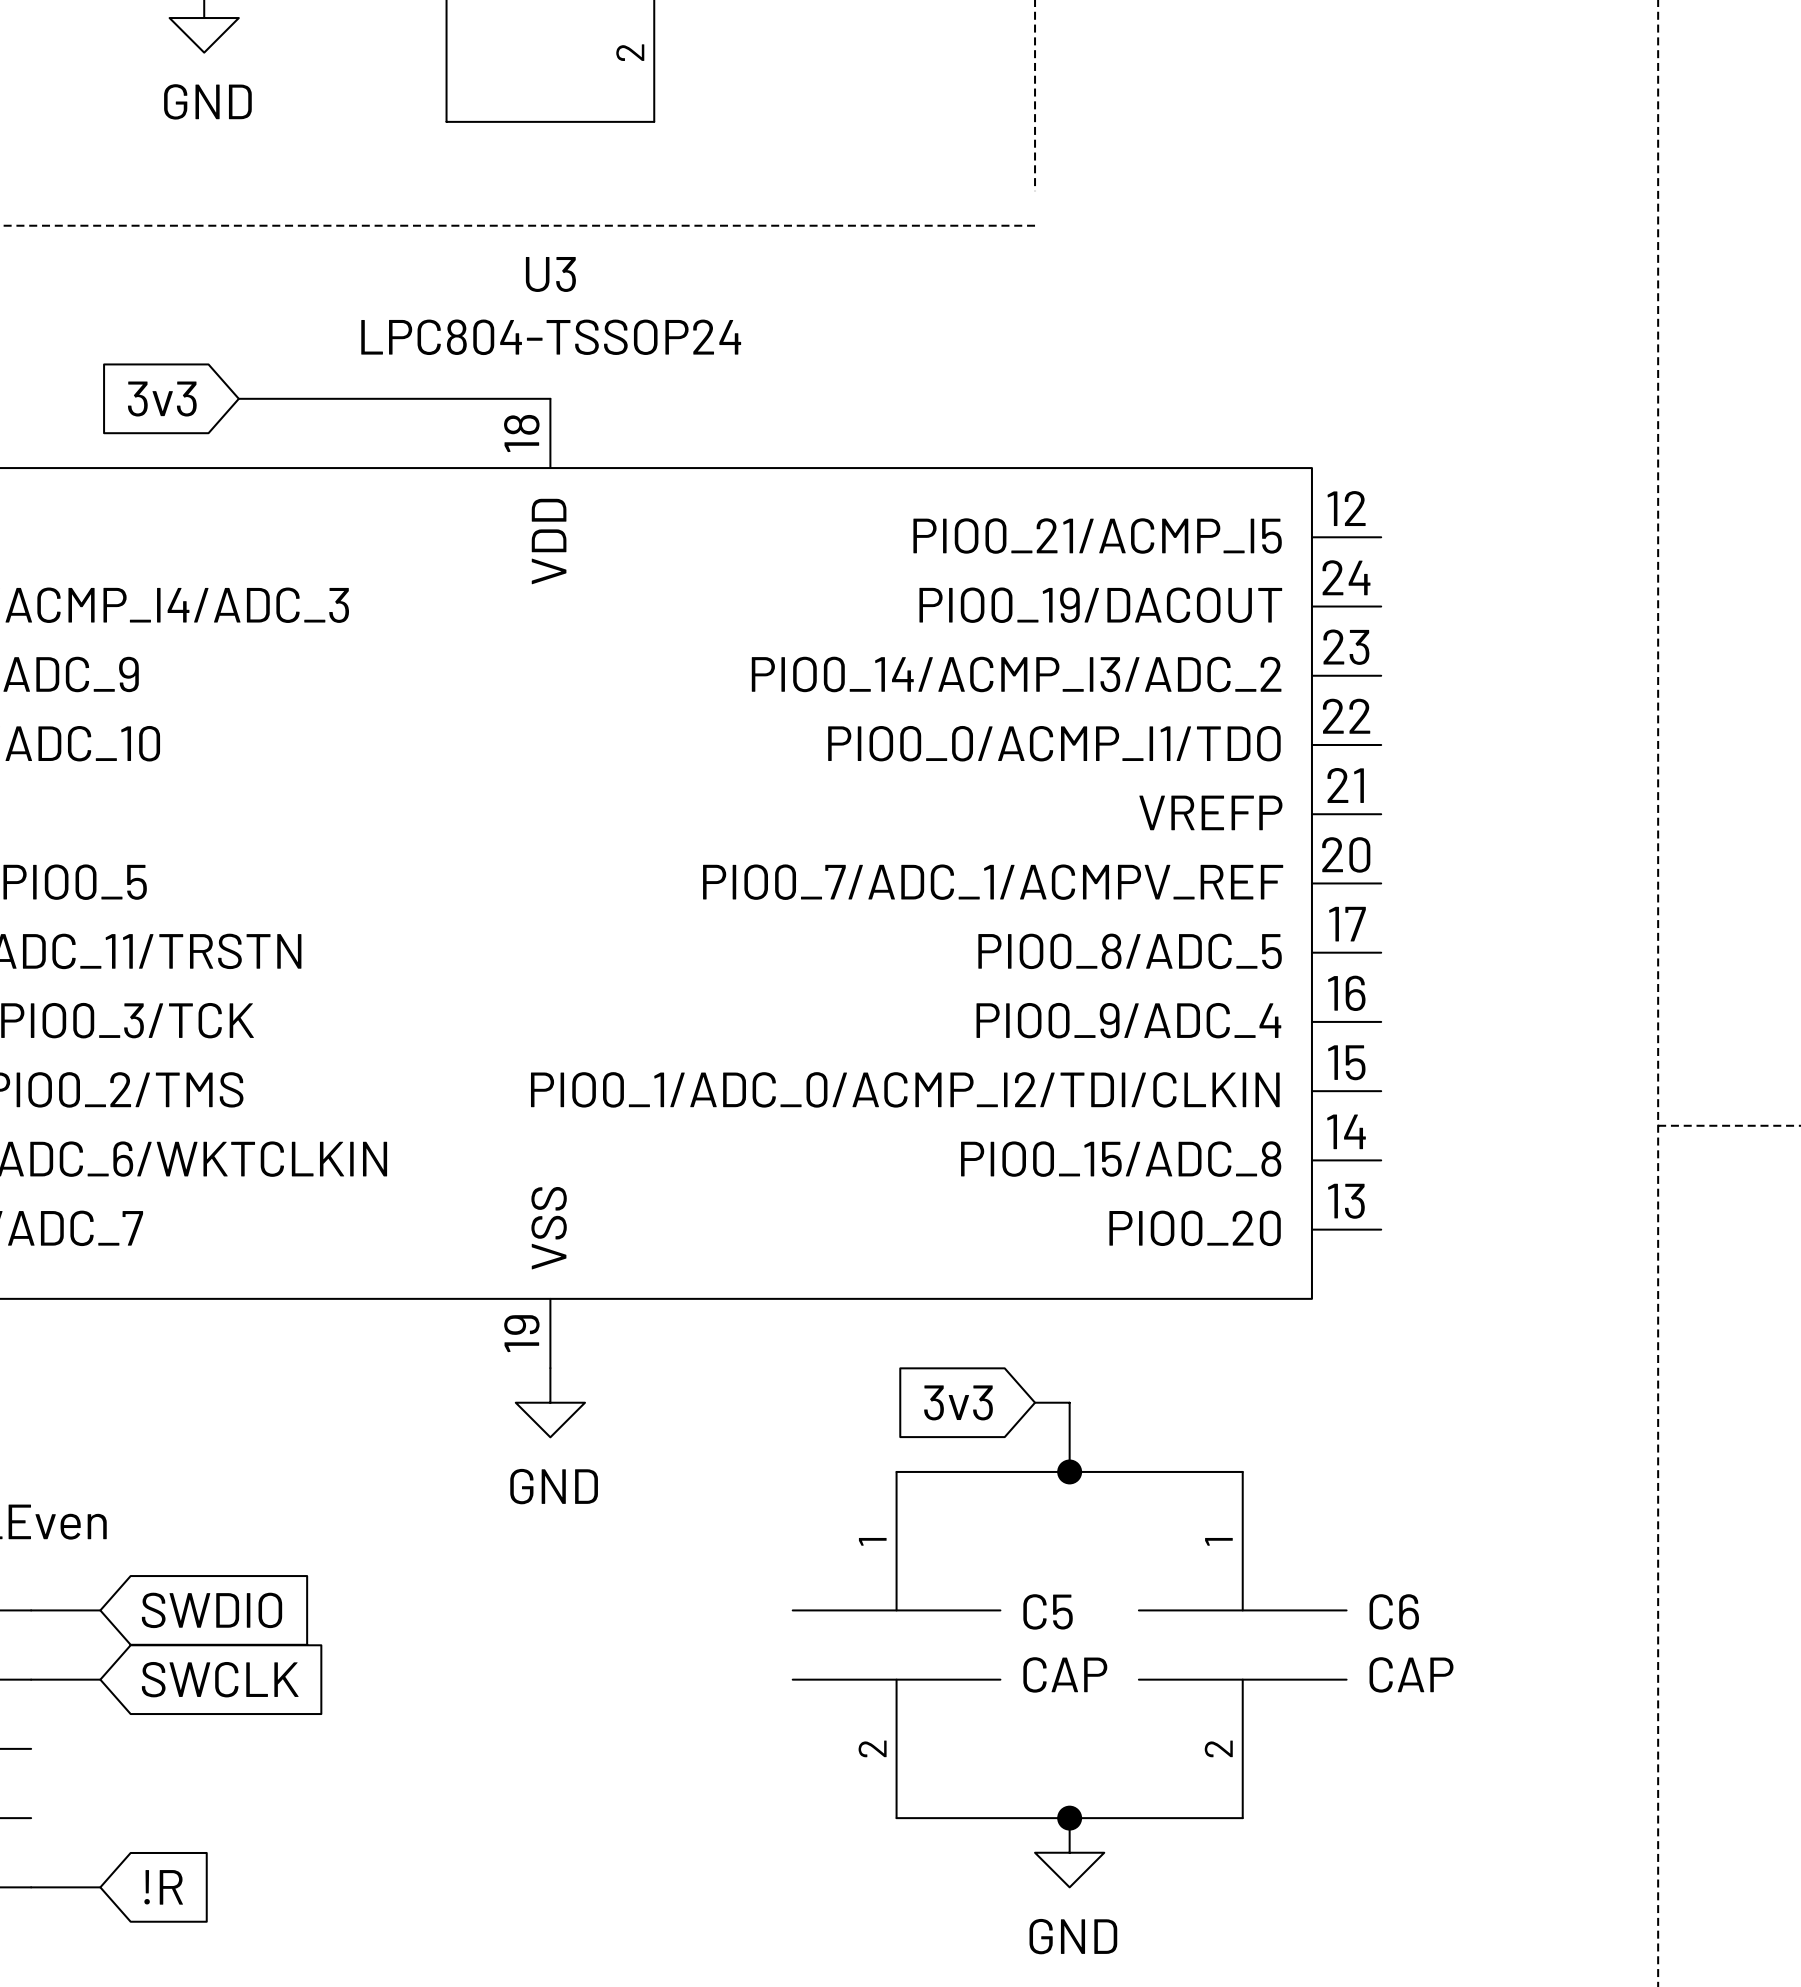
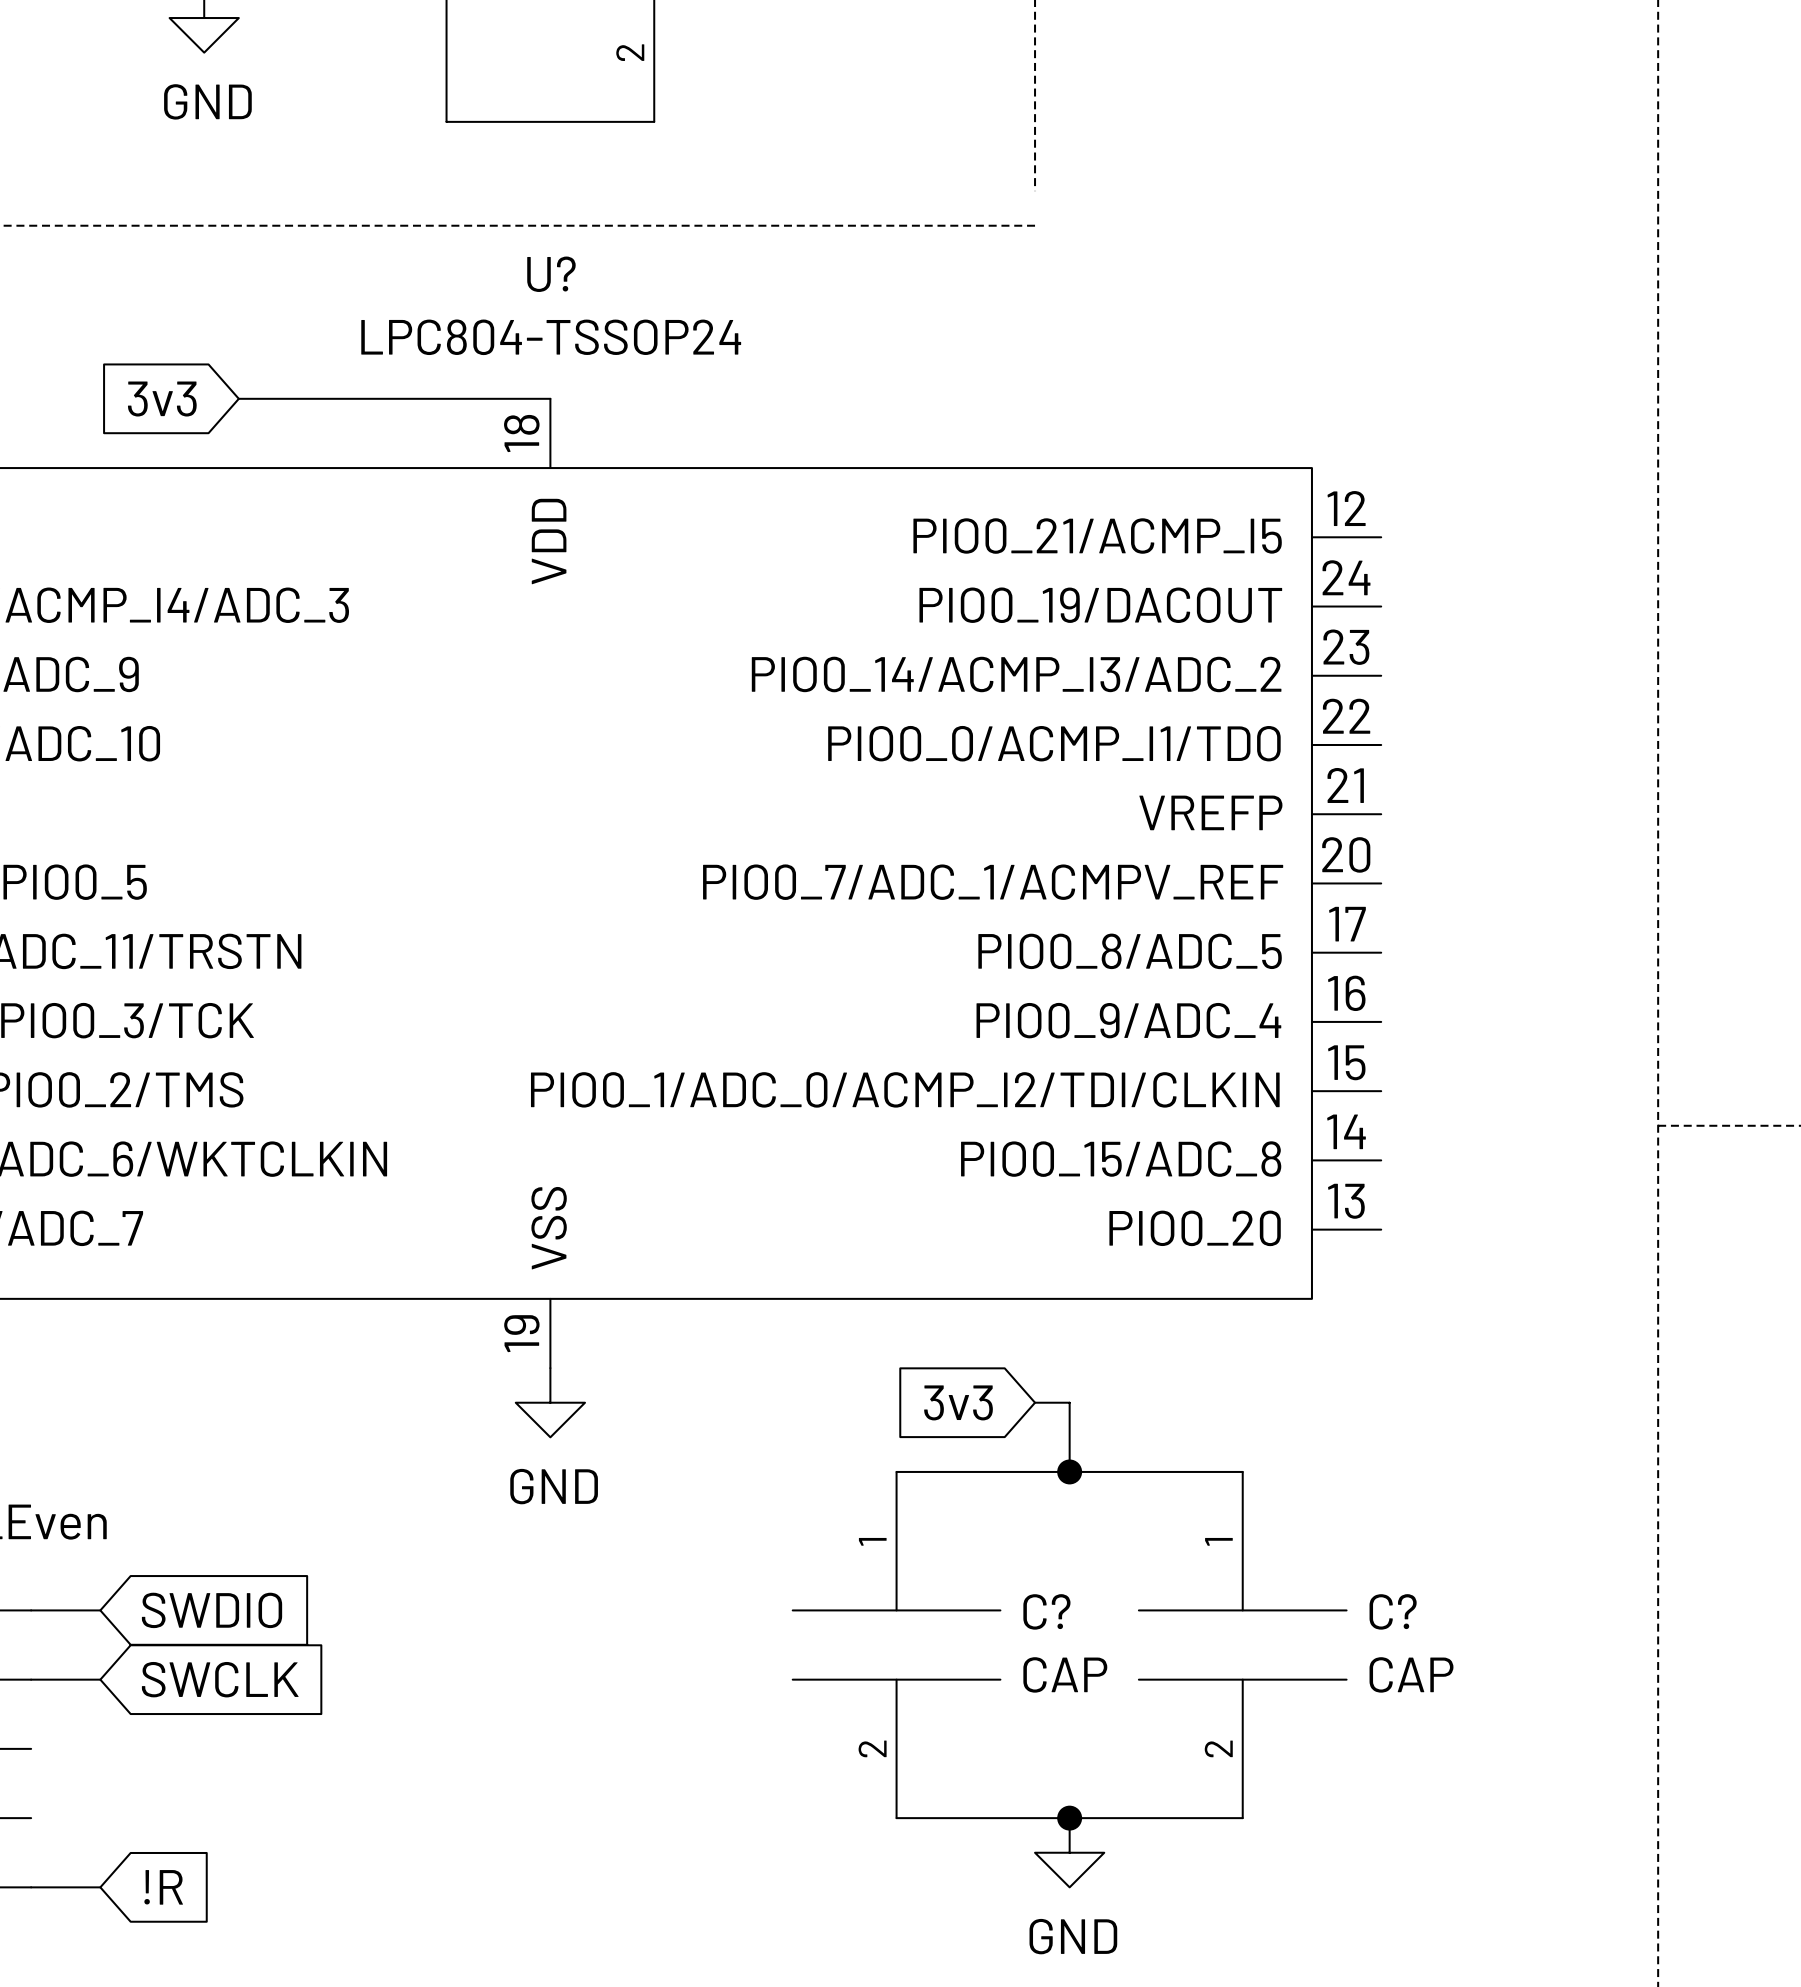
U3 name: U3 (550, 274) -> U? (551, 274)
C5 name: C5 (1048, 1611) -> C? (1046, 1611)
C6 name: C6 (1394, 1611) -> C? (1393, 1611)

